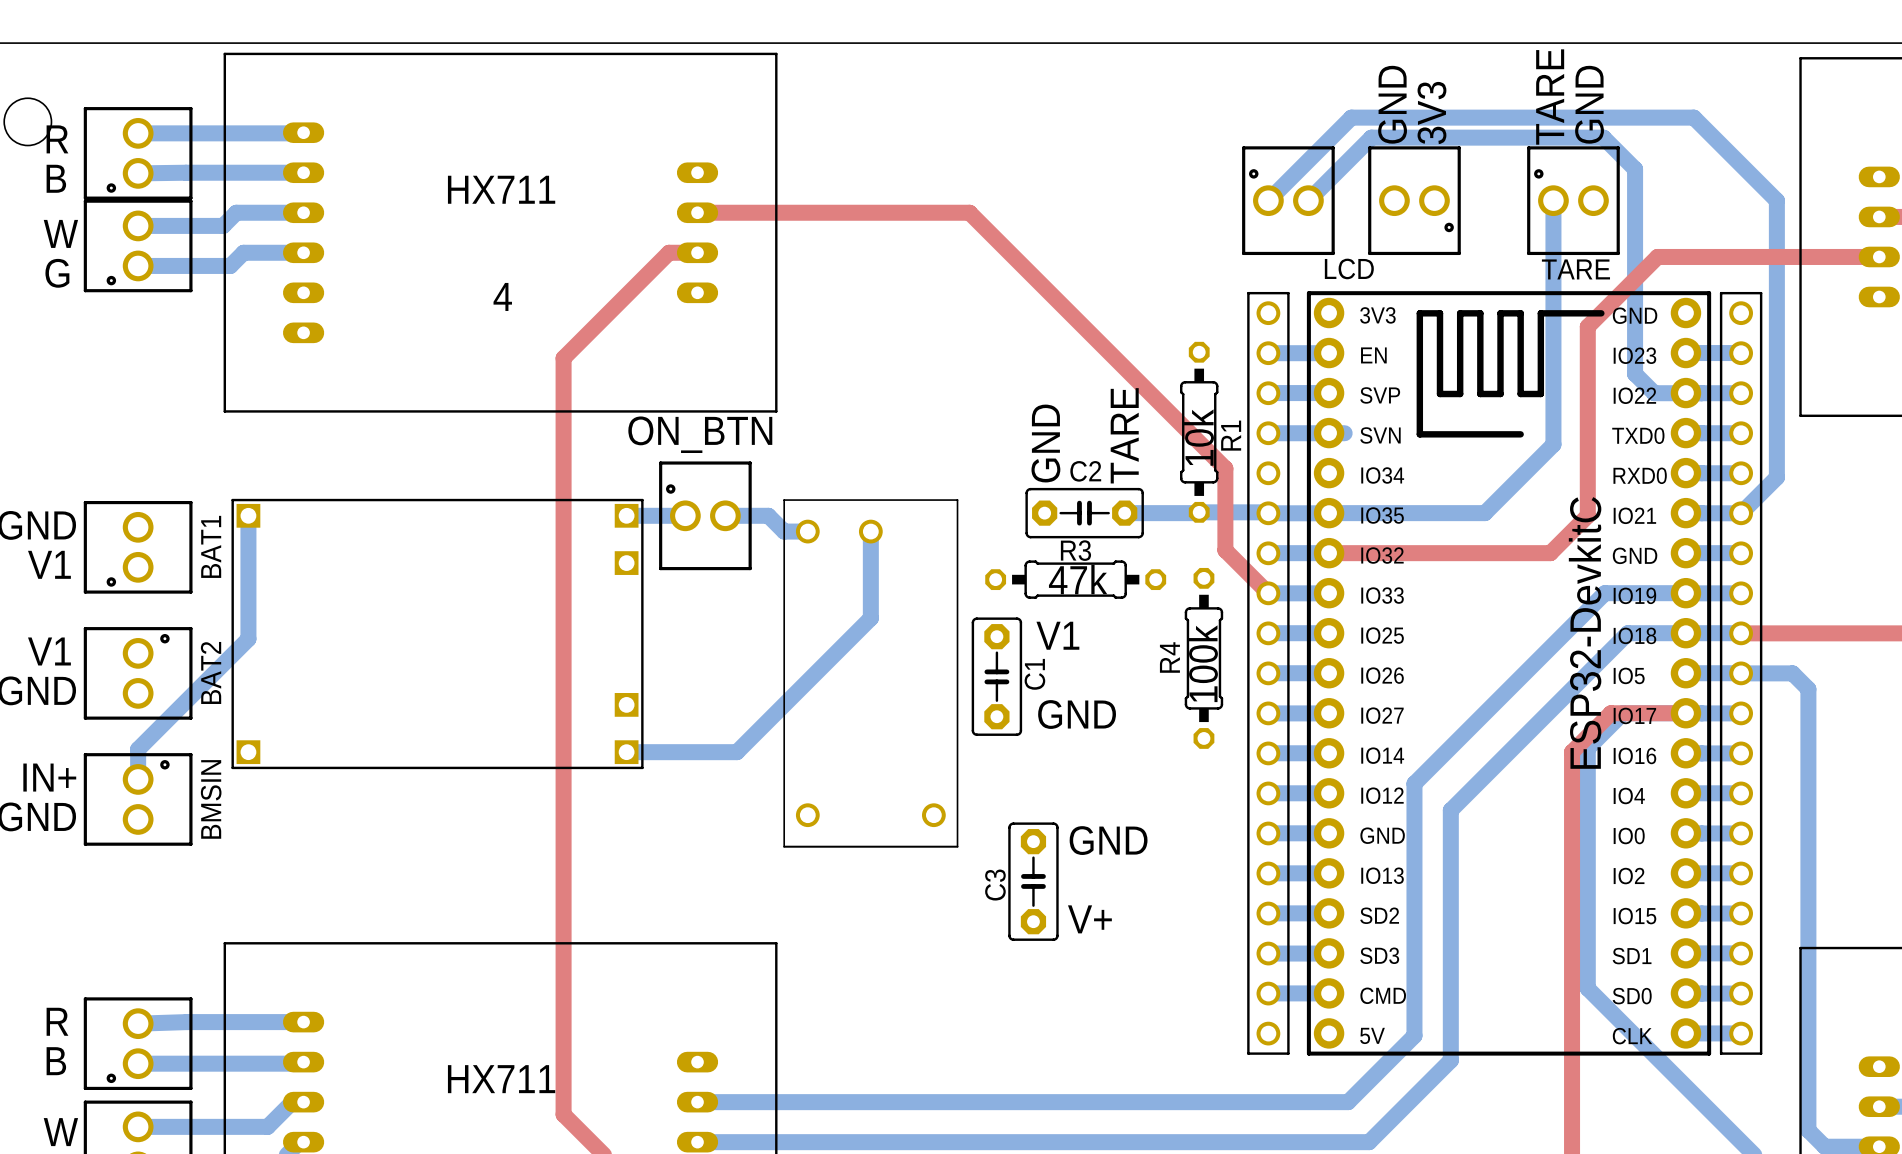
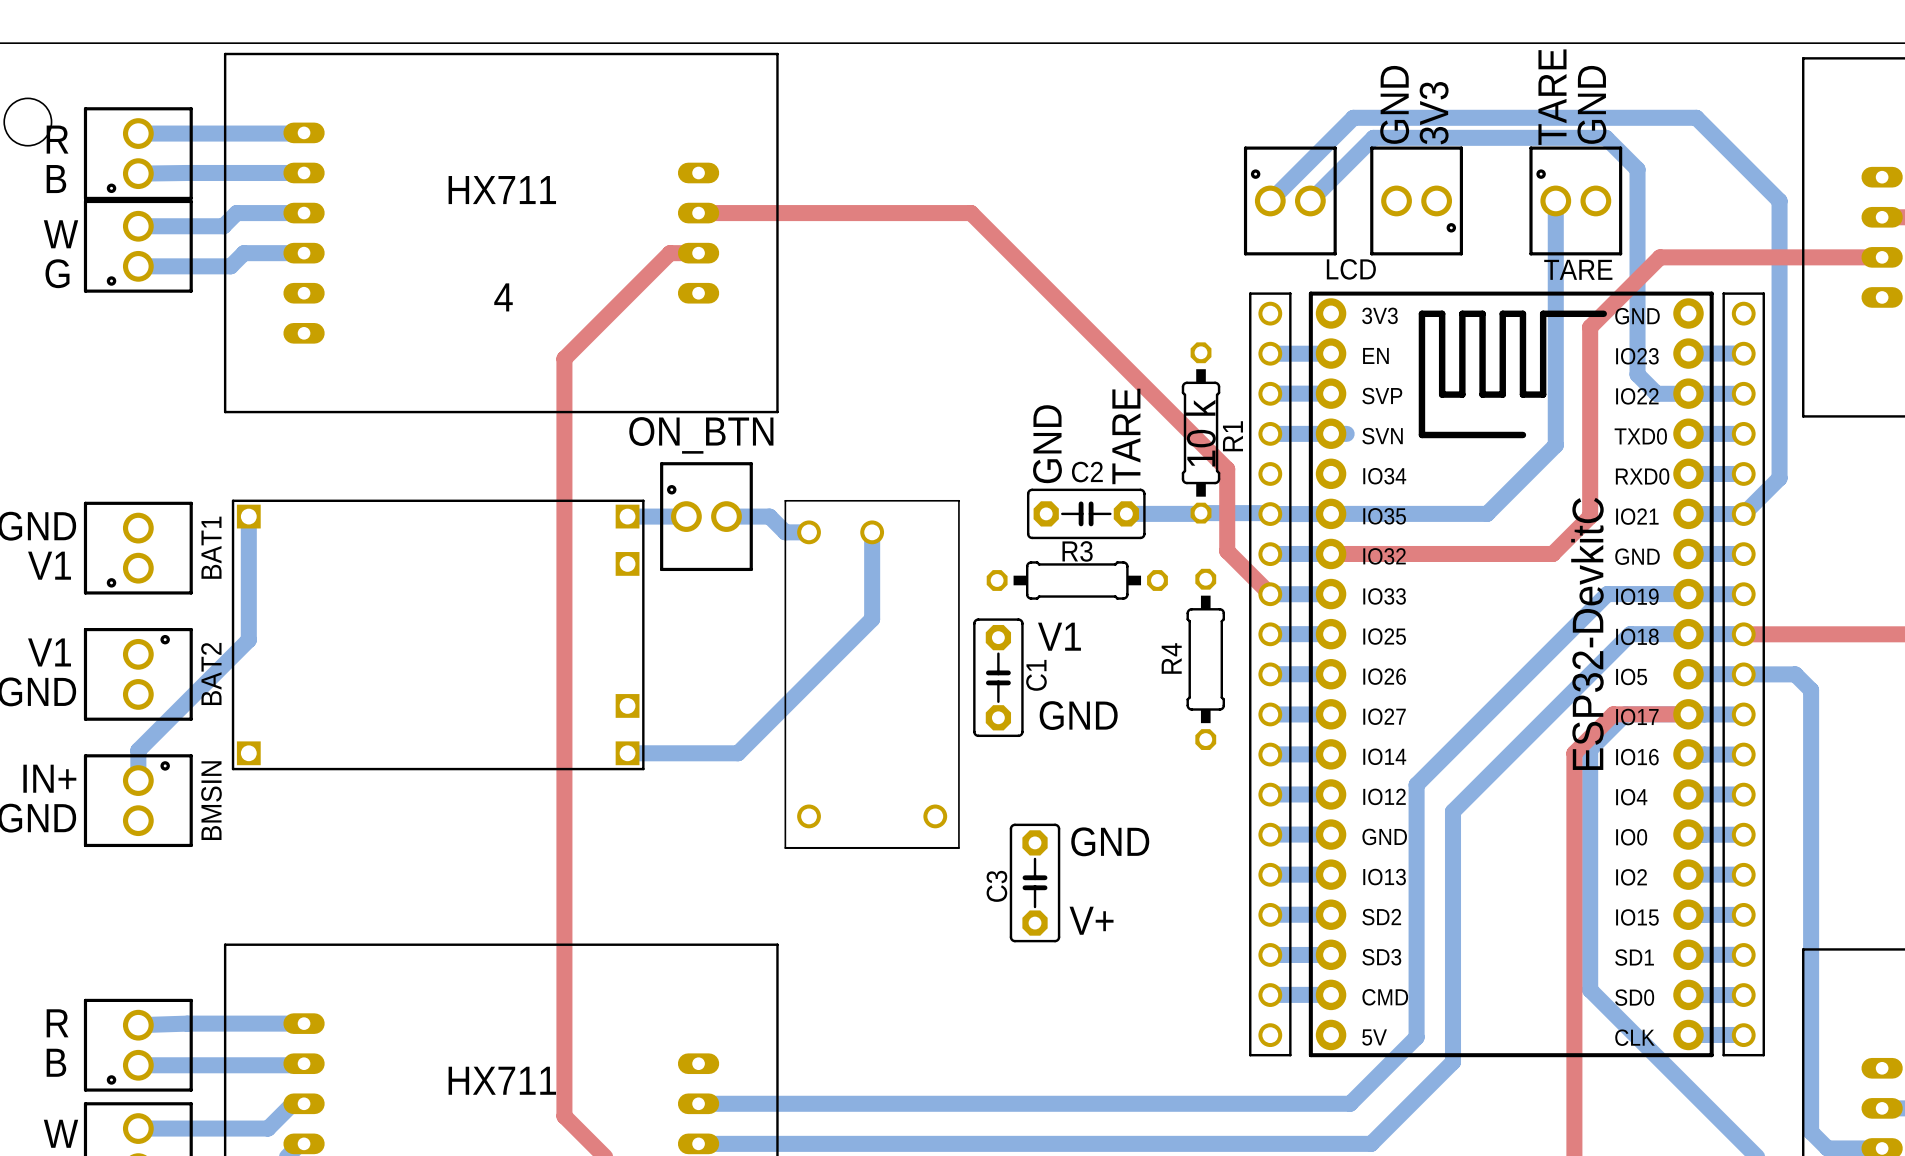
text: 10k (1199, 437) -> 10 k (1200, 433)
text: 47k (1078, 579) -> none
text: 100k (1202, 663) -> none

